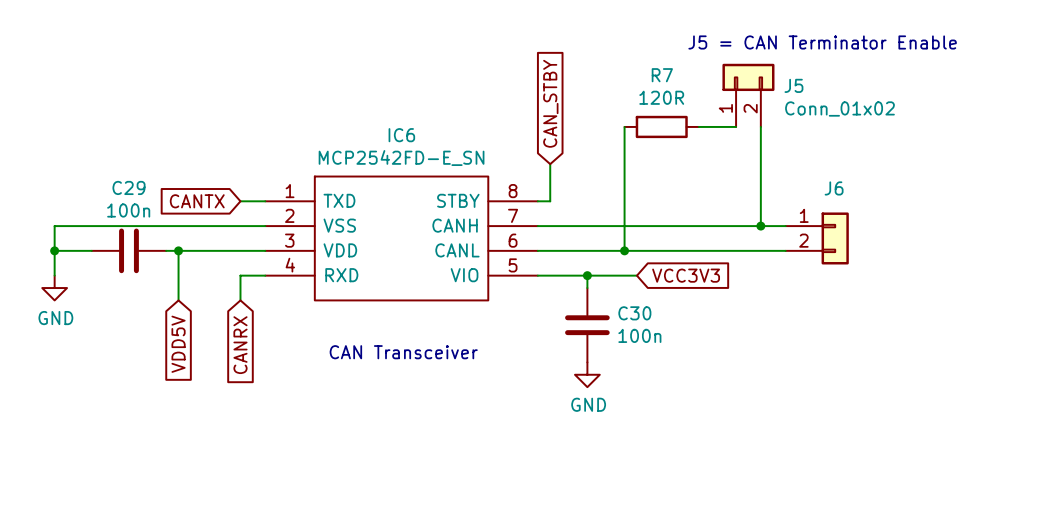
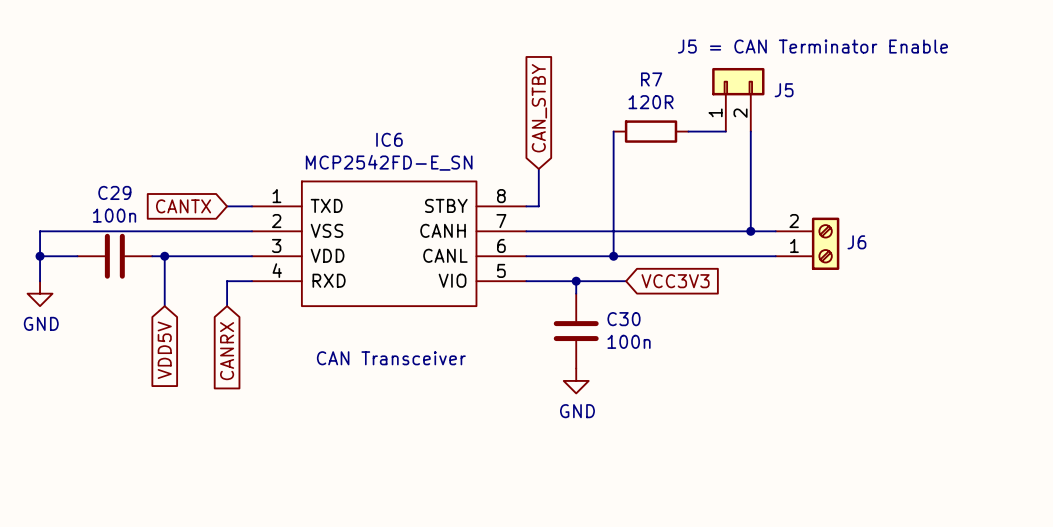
J5 value: Conn_01x02 (839, 109) -> none
J6 name position: J6 (834, 188) -> J6 (856, 242)
J6 symbol: [785, 212, 849, 265] -> [775, 217, 840, 270]

